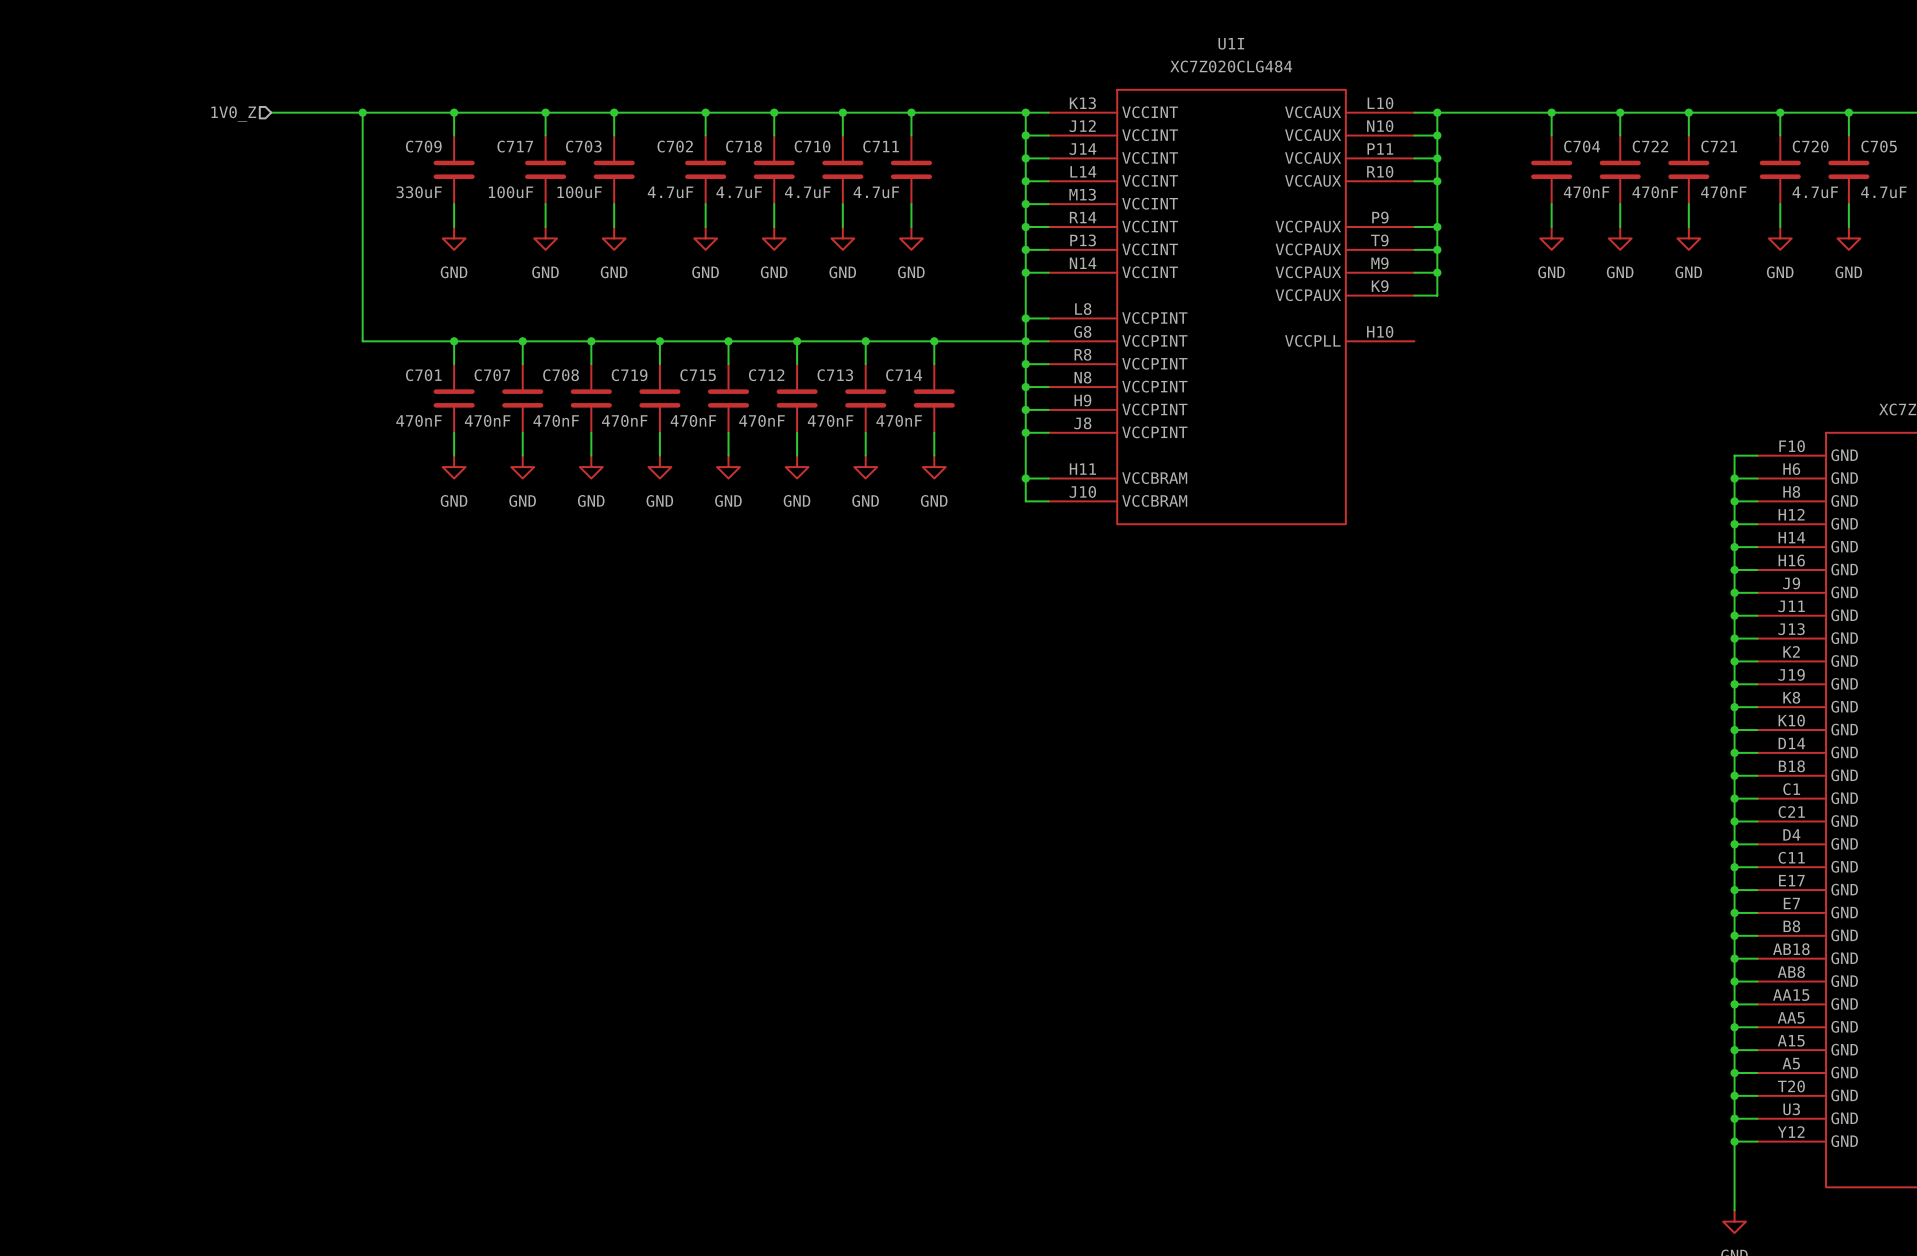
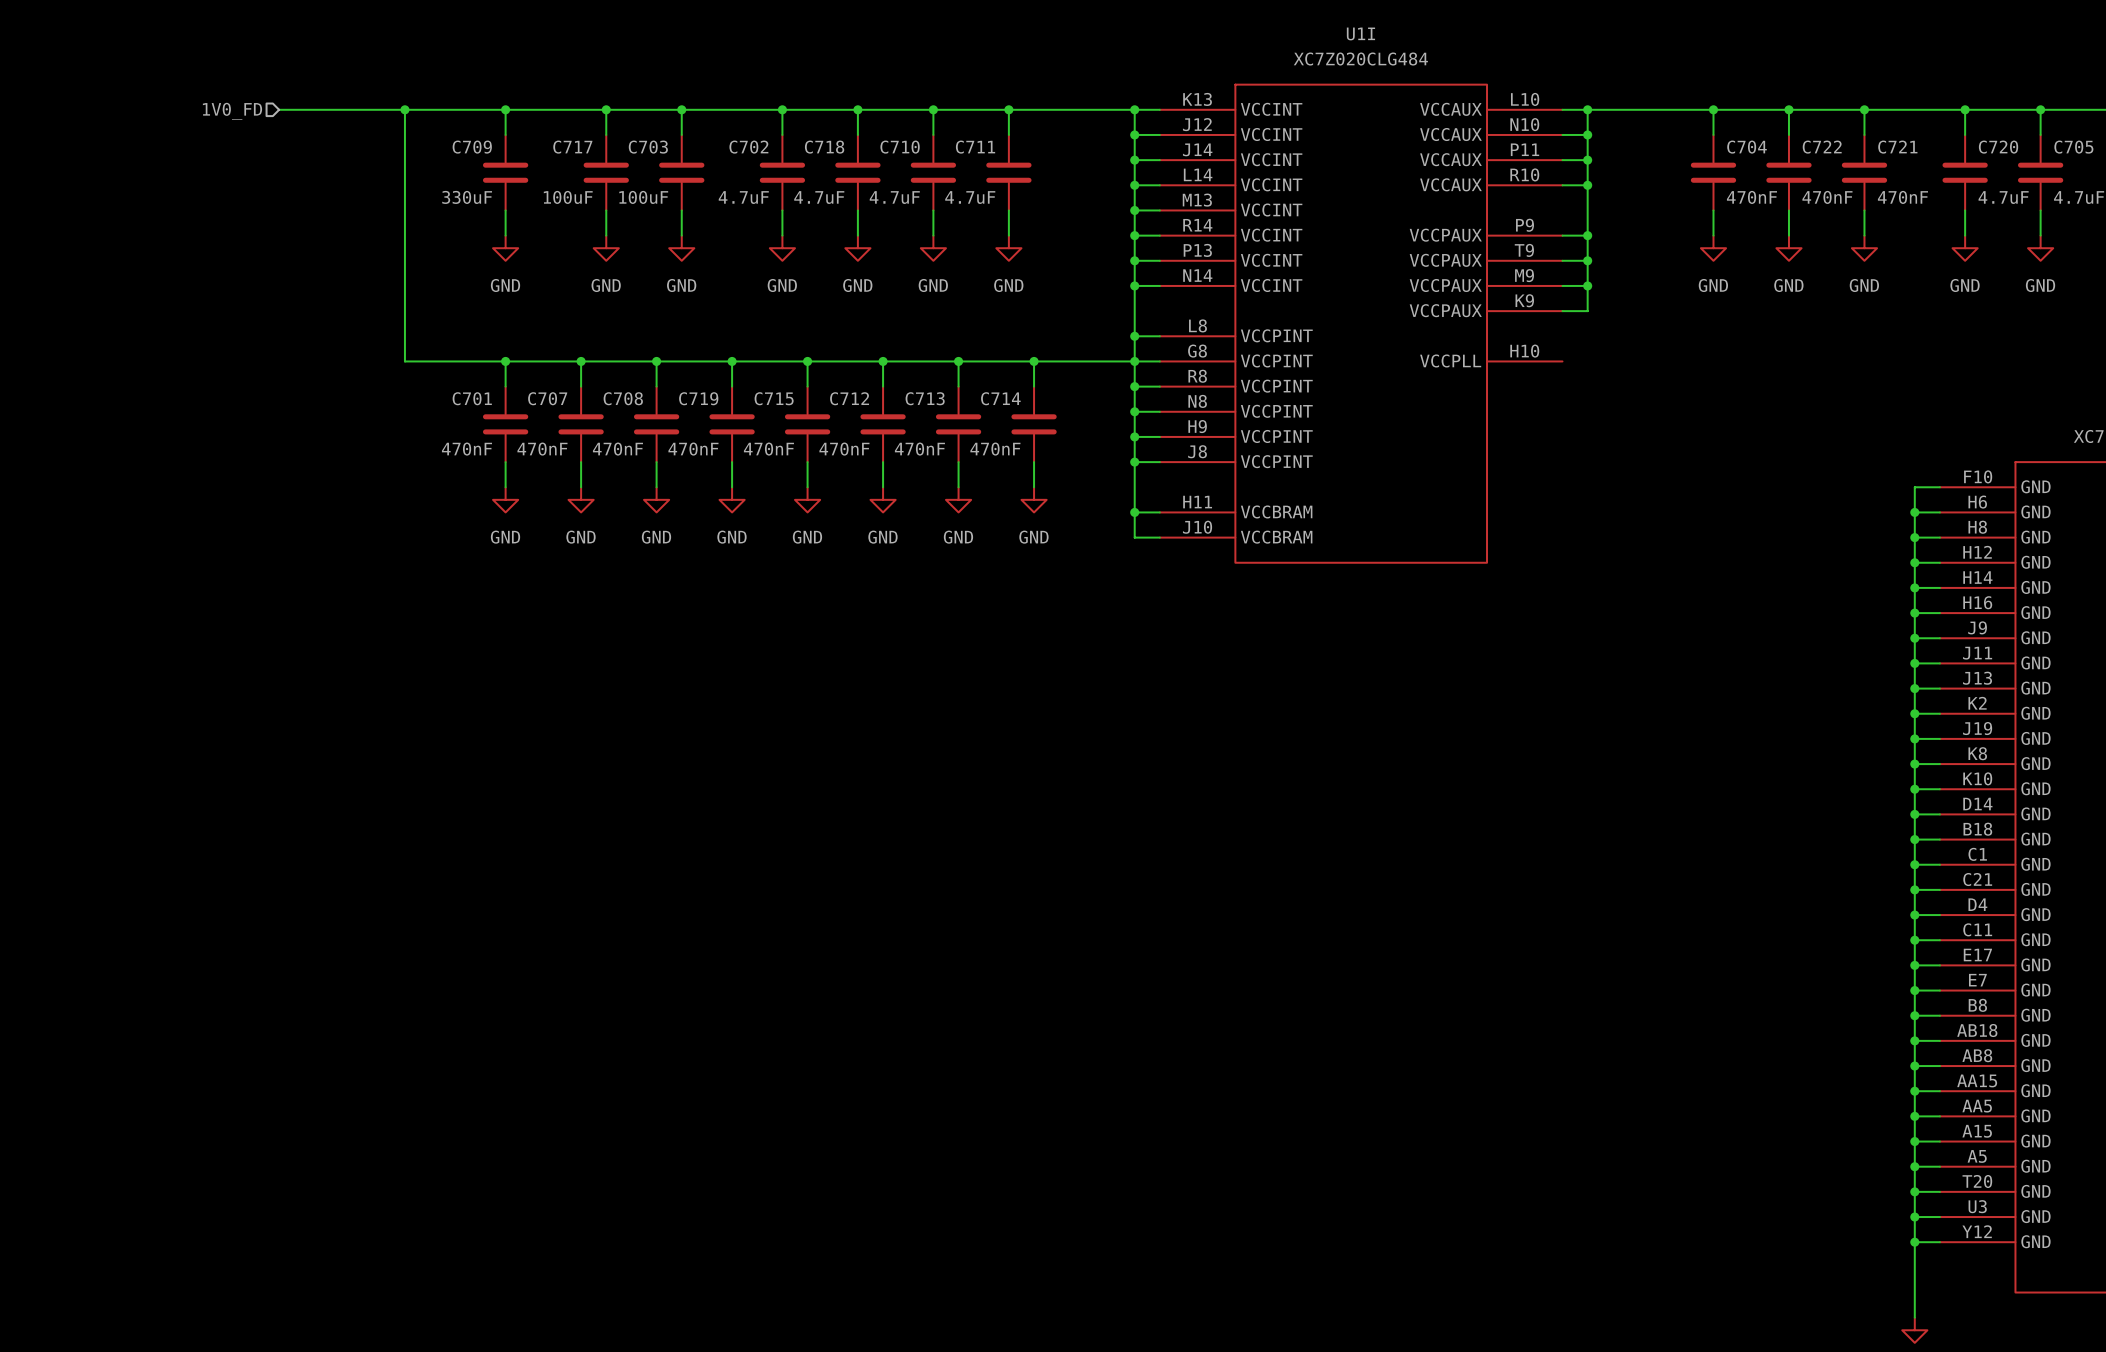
wire: none -> (279, 109) (304, 109)
hierarchical label: 1V0_Z (233, 113) -> 1V0_FD (232, 111)

